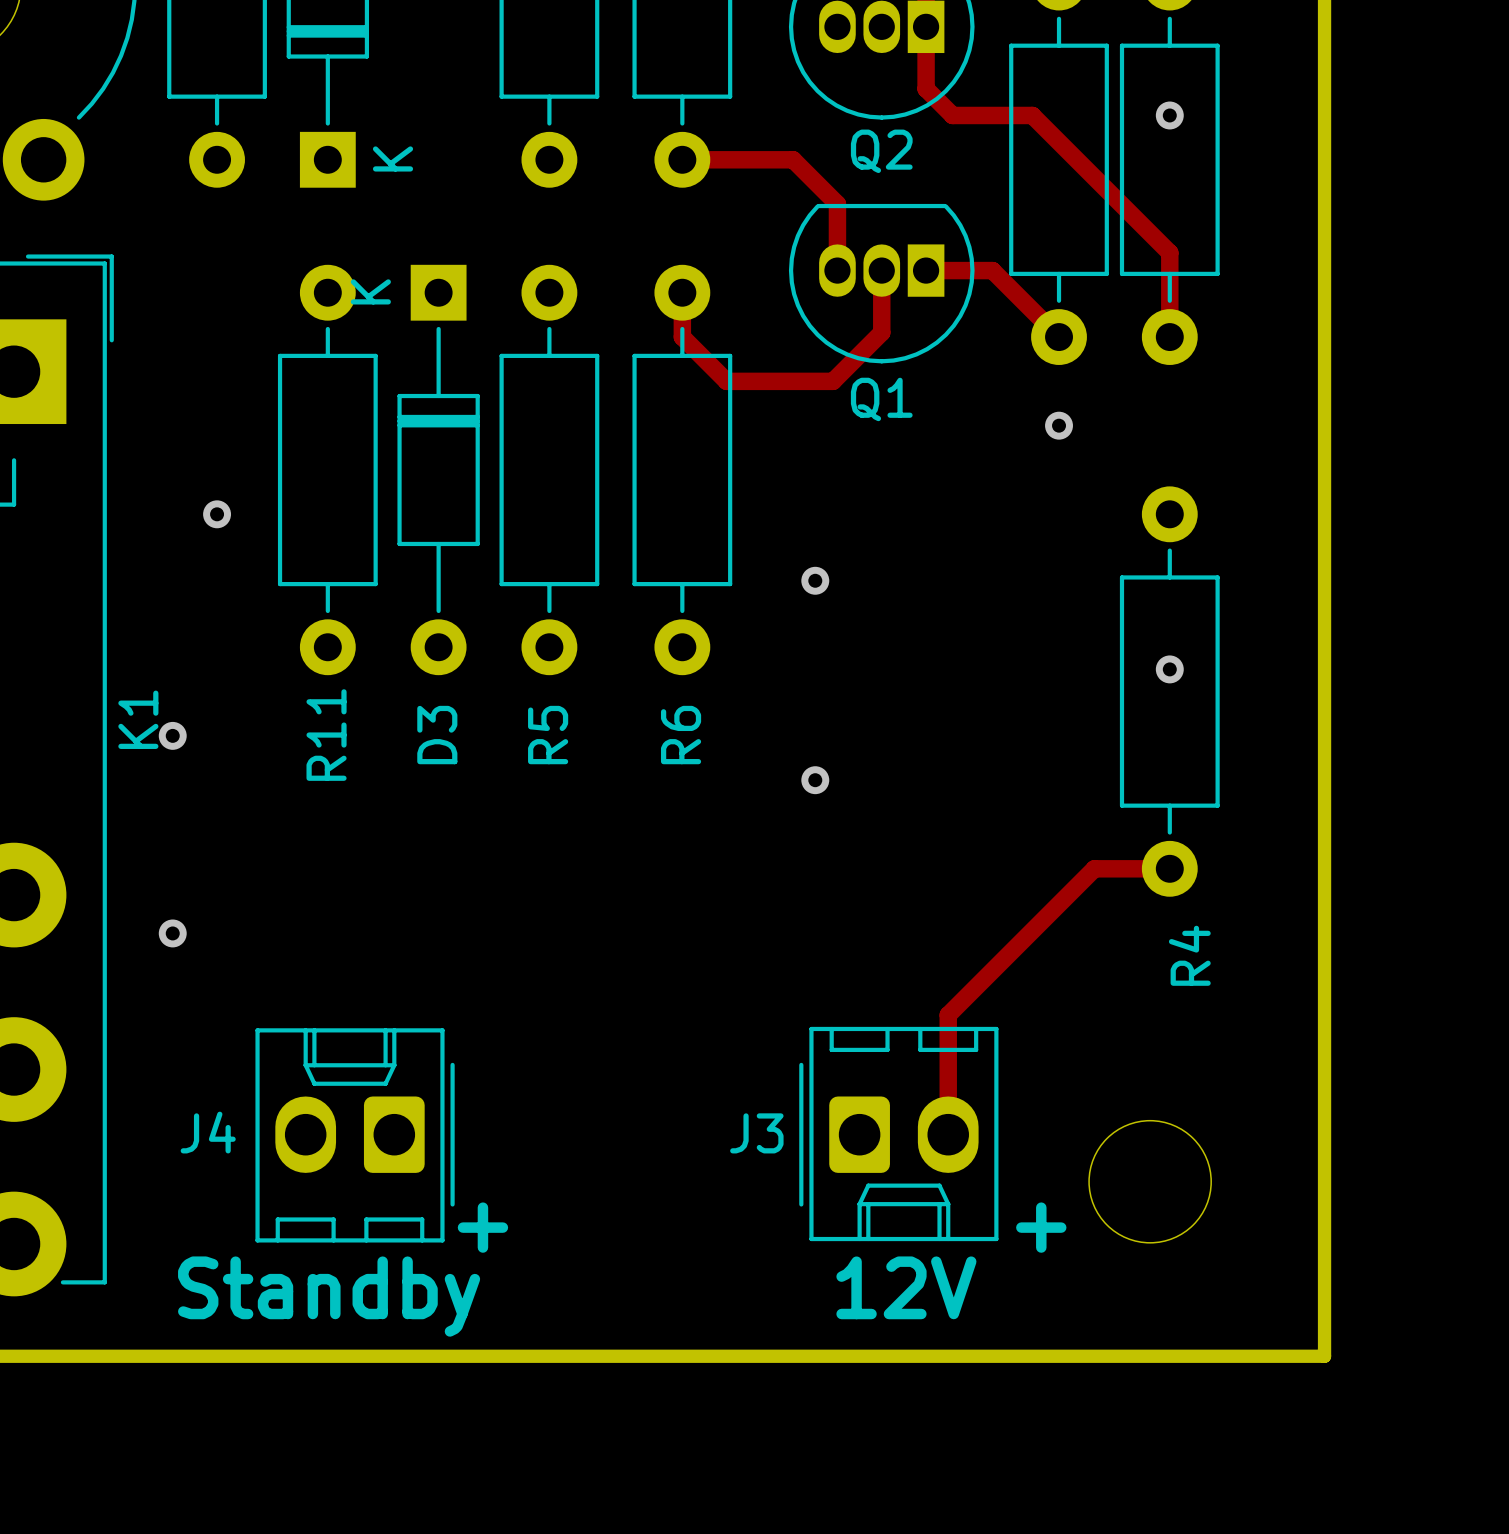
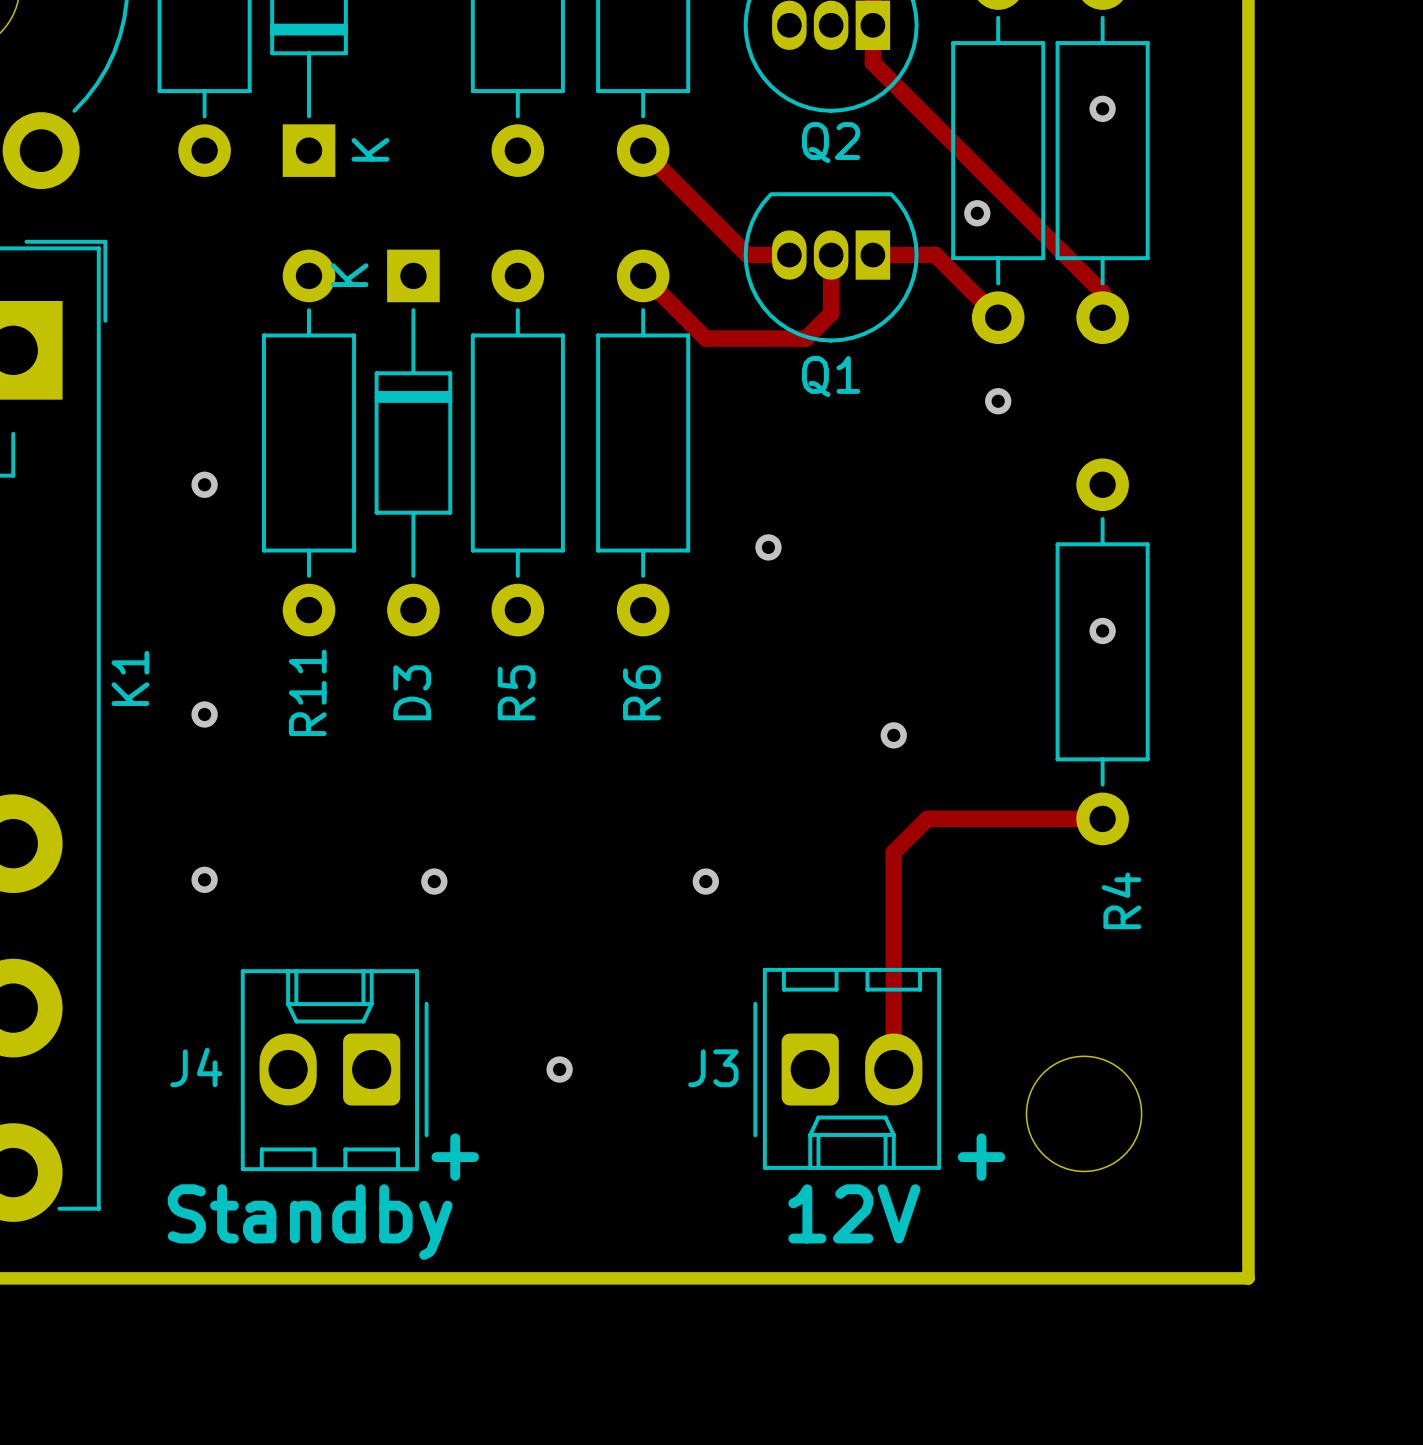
track: (926, 66) (926, 88) (952, 115) (1032, 115) (1169, 252) (1169, 310) -> (872, 62) (1102, 292)
track: (682, 159) (793, 159) (837, 204) (837, 270) -> (643, 150) (747, 255) (789, 255)
via: none -> (977, 213)
track: (682, 292) (682, 337) (726, 381) (833, 381) (855, 359) -> (643, 275) (705, 338) (806, 338)
via position: (172, 735) -> (204, 714)
via: (815, 780) -> none
via: none -> (893, 735)
track: (1094, 868) (948, 1015) -> (1031, 818) (927, 818) (893, 852) (893, 956)
via position: (172, 933) -> (204, 879)
via: none -> (434, 881)
via: none -> (705, 881)
via: none -> (559, 1069)

